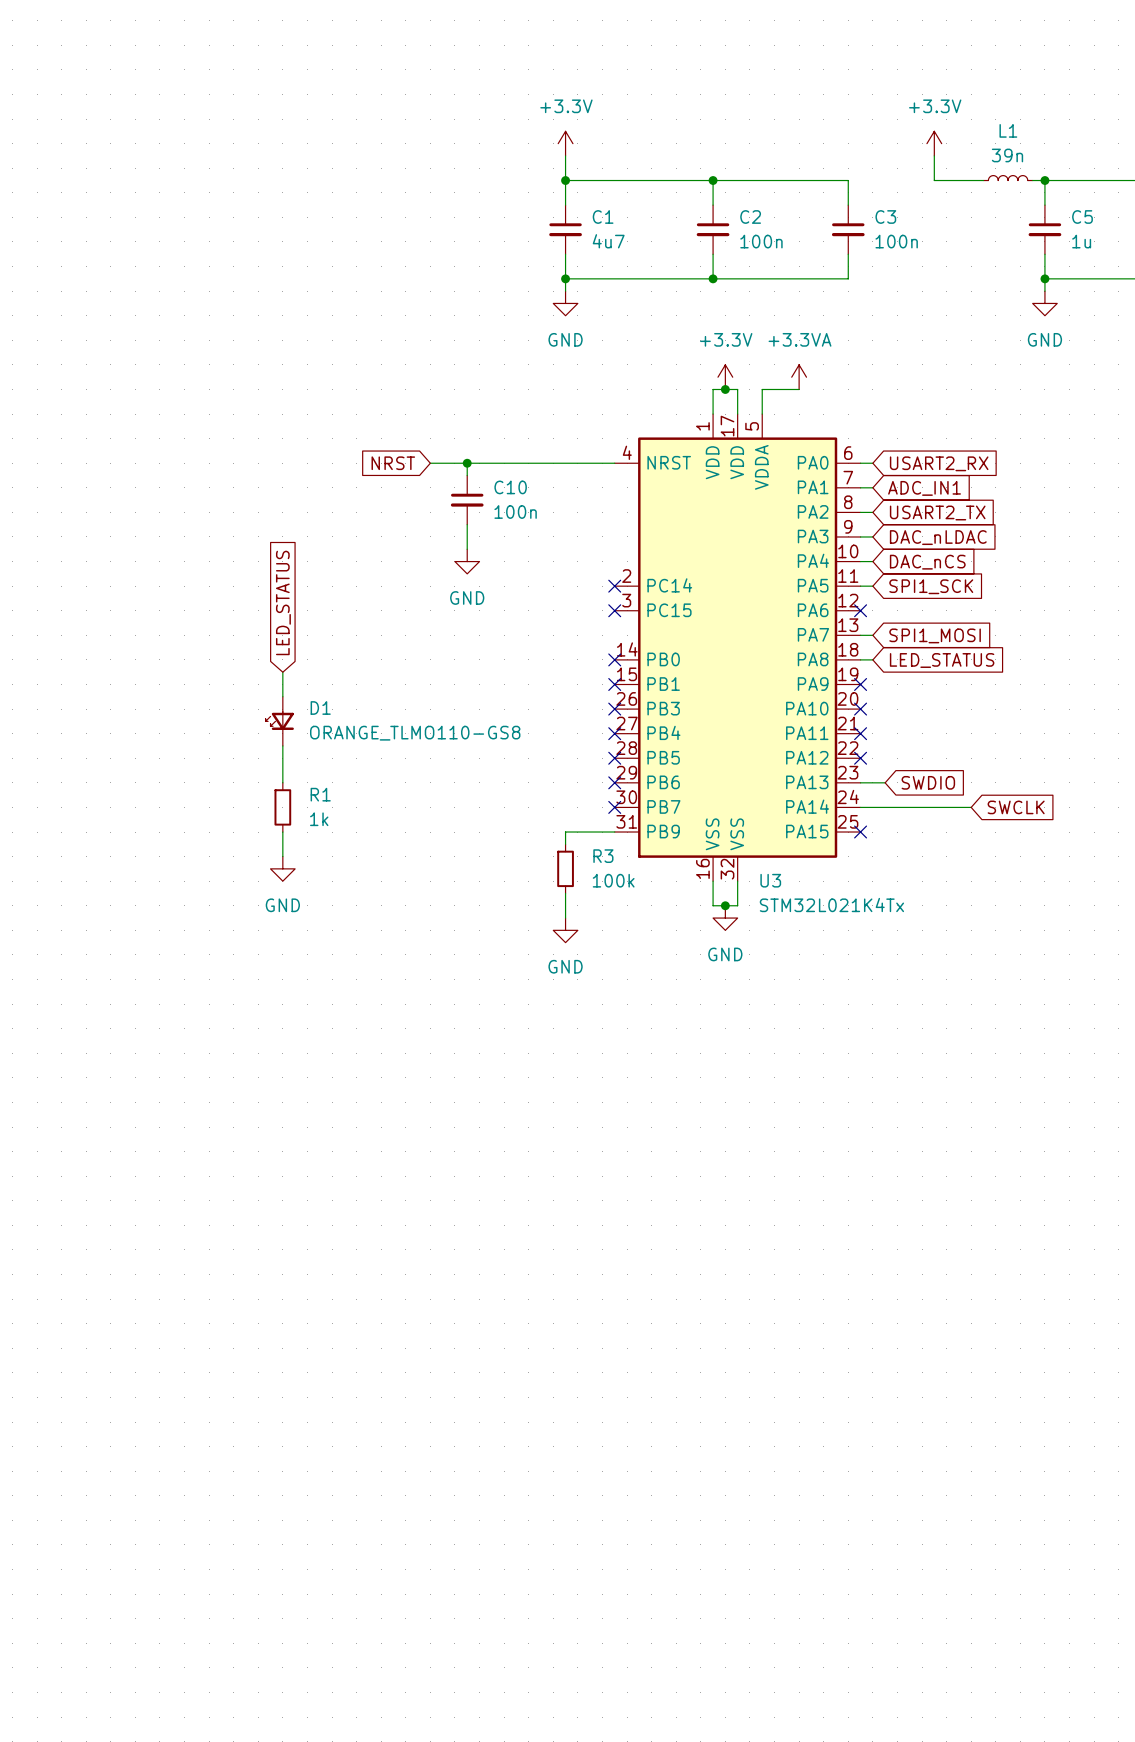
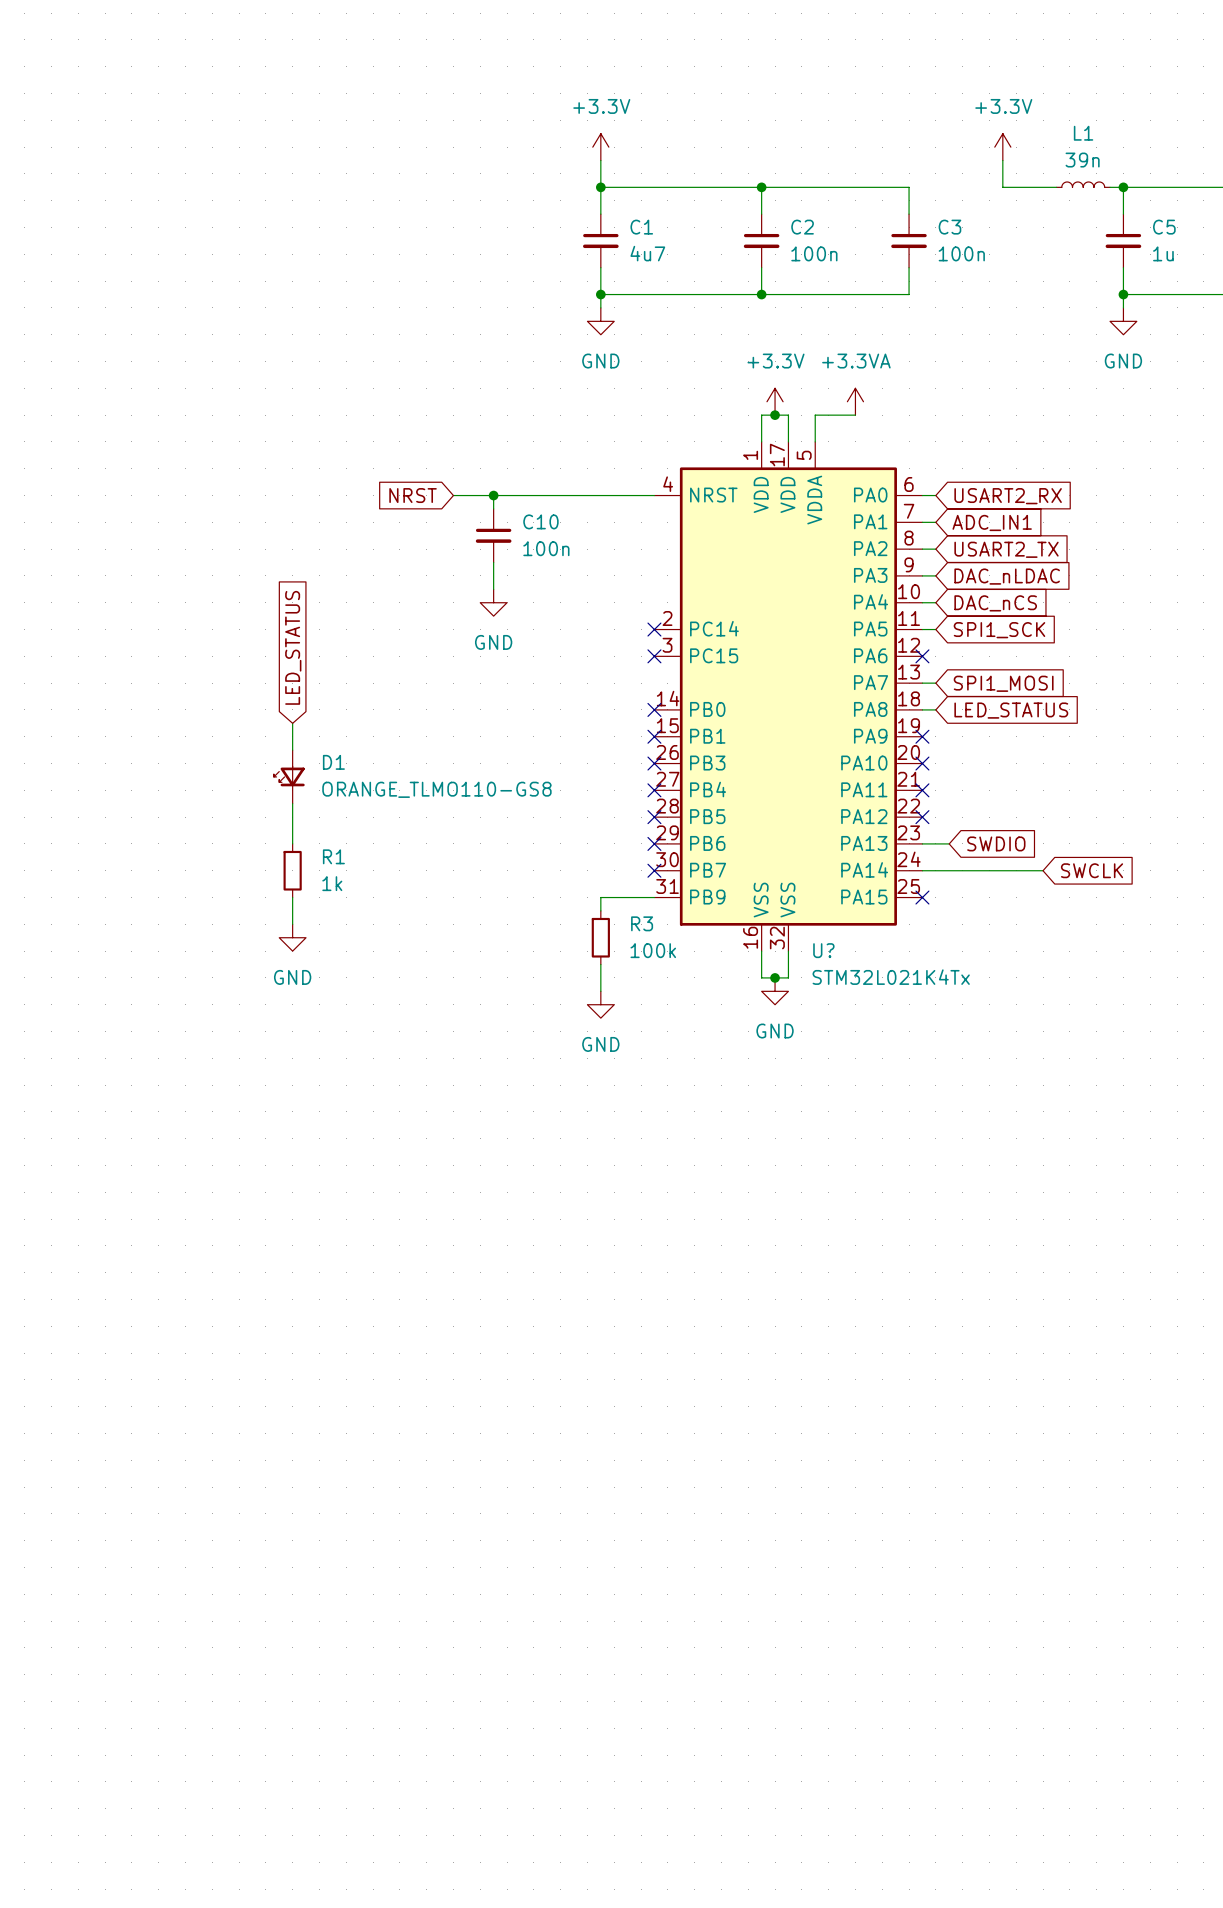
U3 name: U3 (770, 880) -> U? (823, 950)

